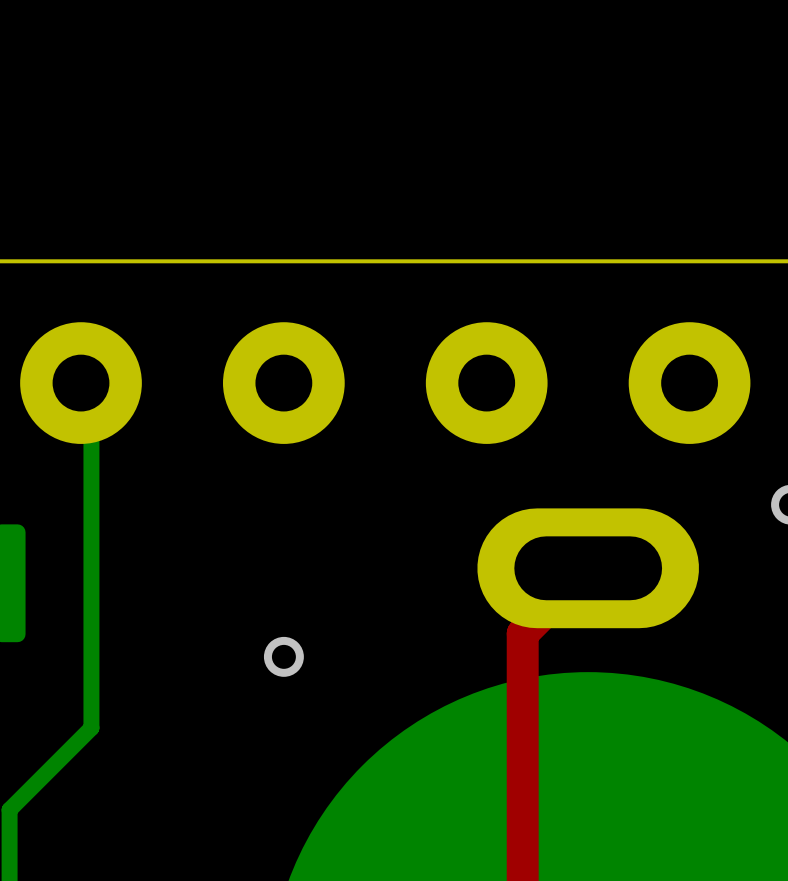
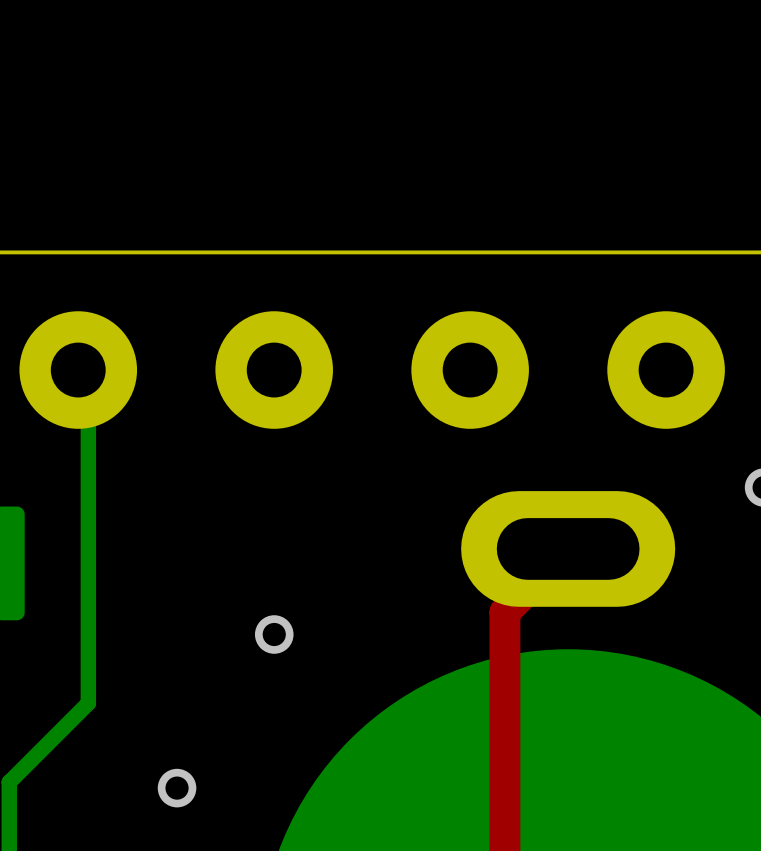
via: none -> (177, 788)

